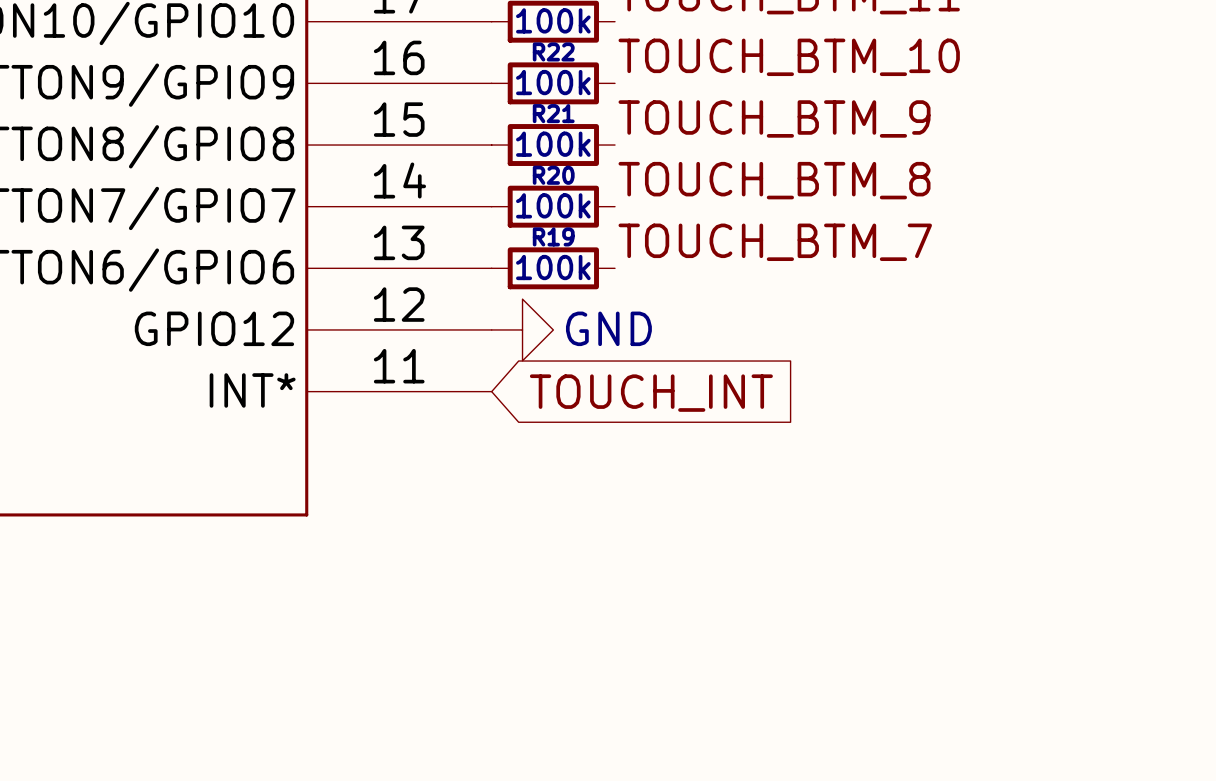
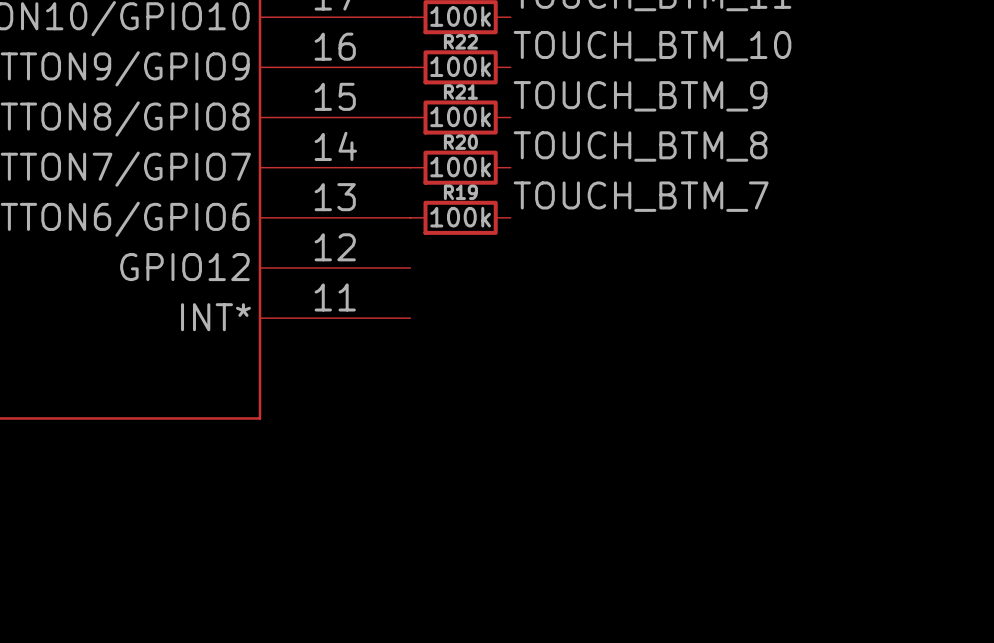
power symbol: GND (522, 329) -> none
global label: TOUCH_INT (651, 393) -> none

